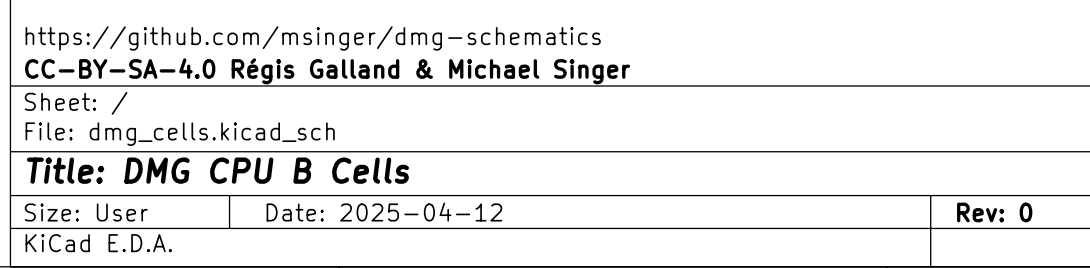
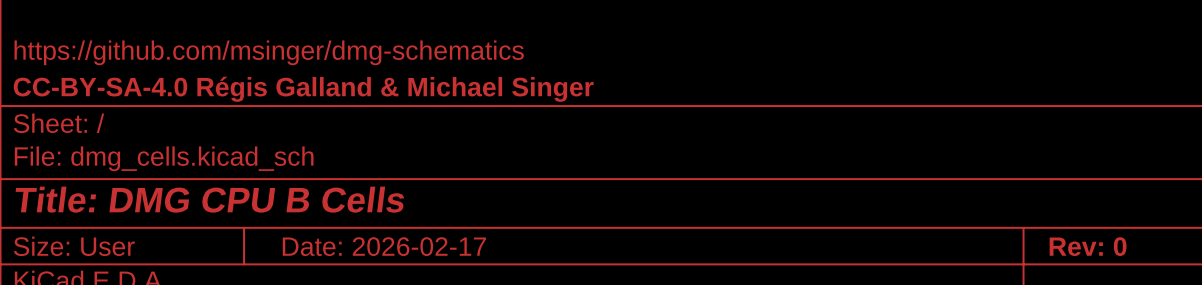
title block: Date: 2025-04-12 (384, 212) -> Date: 2026-02-17 (384, 246)

